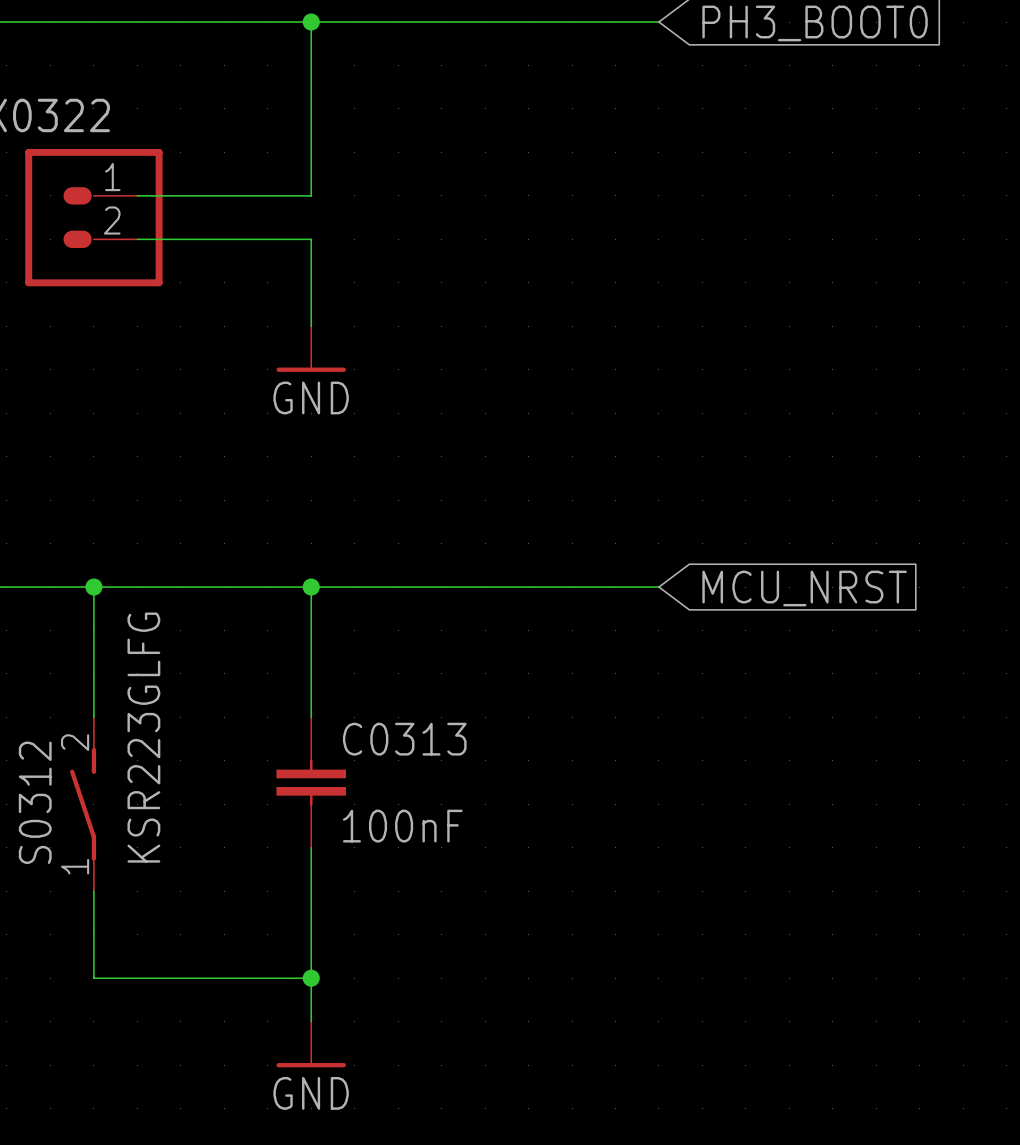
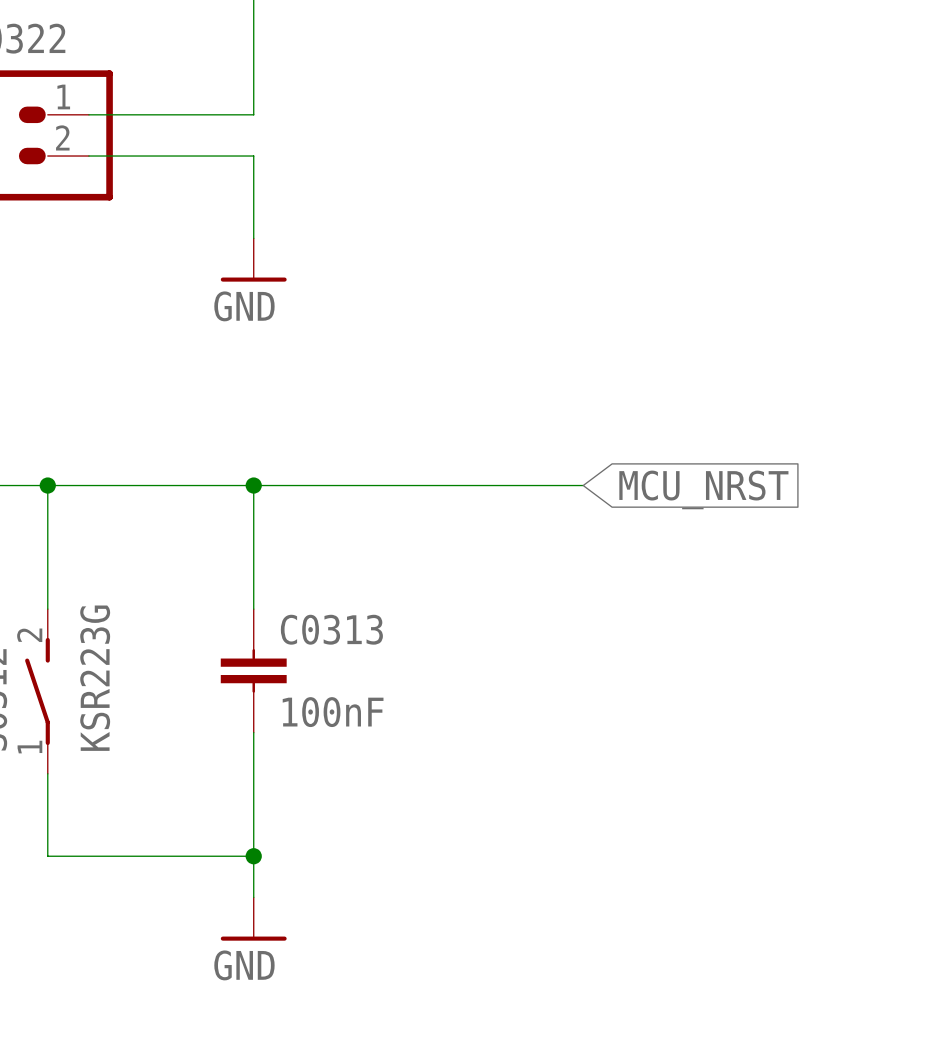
S0312 value: KSR223GLFG (143, 737) -> KSR223G (95, 678)

